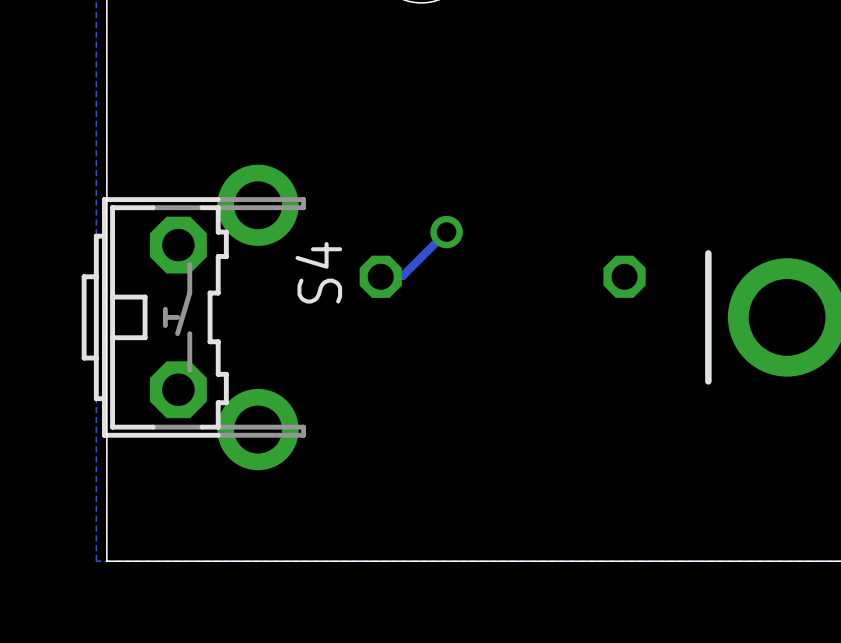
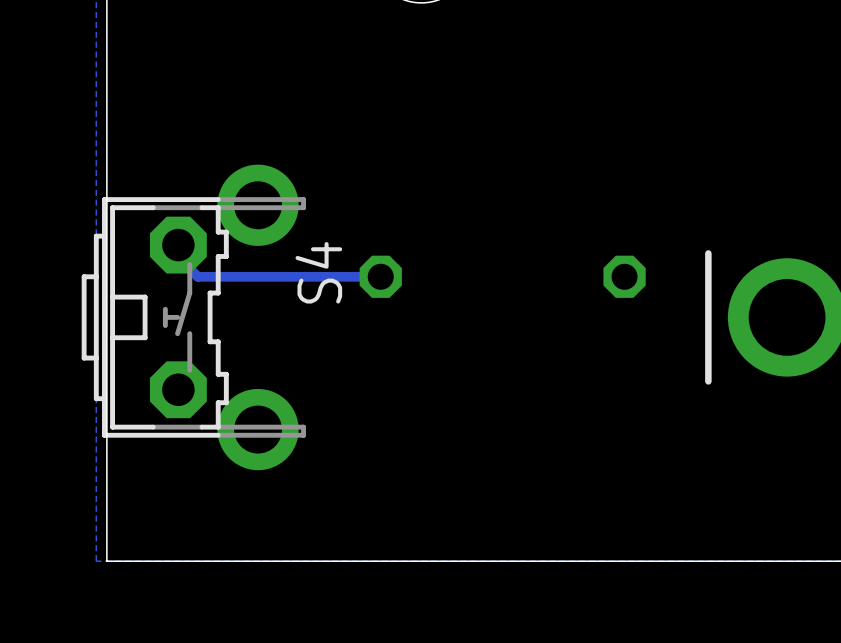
track: (446, 232) (402, 275) (380, 276) -> (178, 245) (178, 257) (197, 276) (380, 276)
via: (446, 232) -> none

